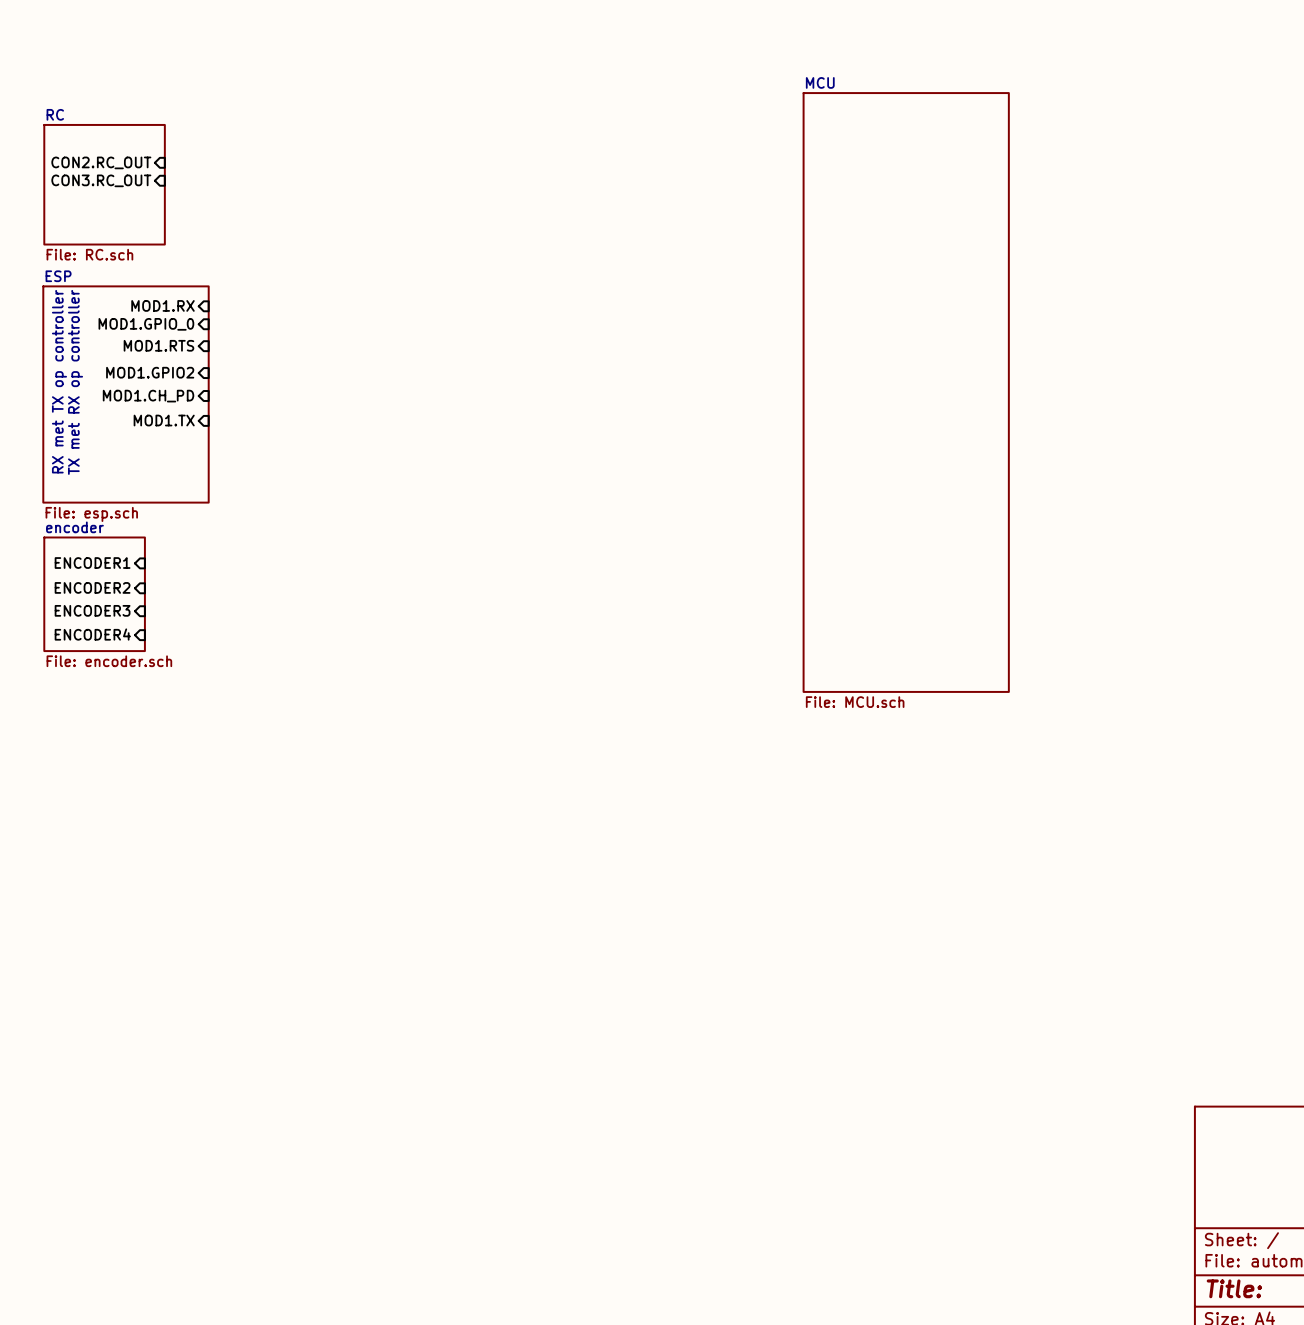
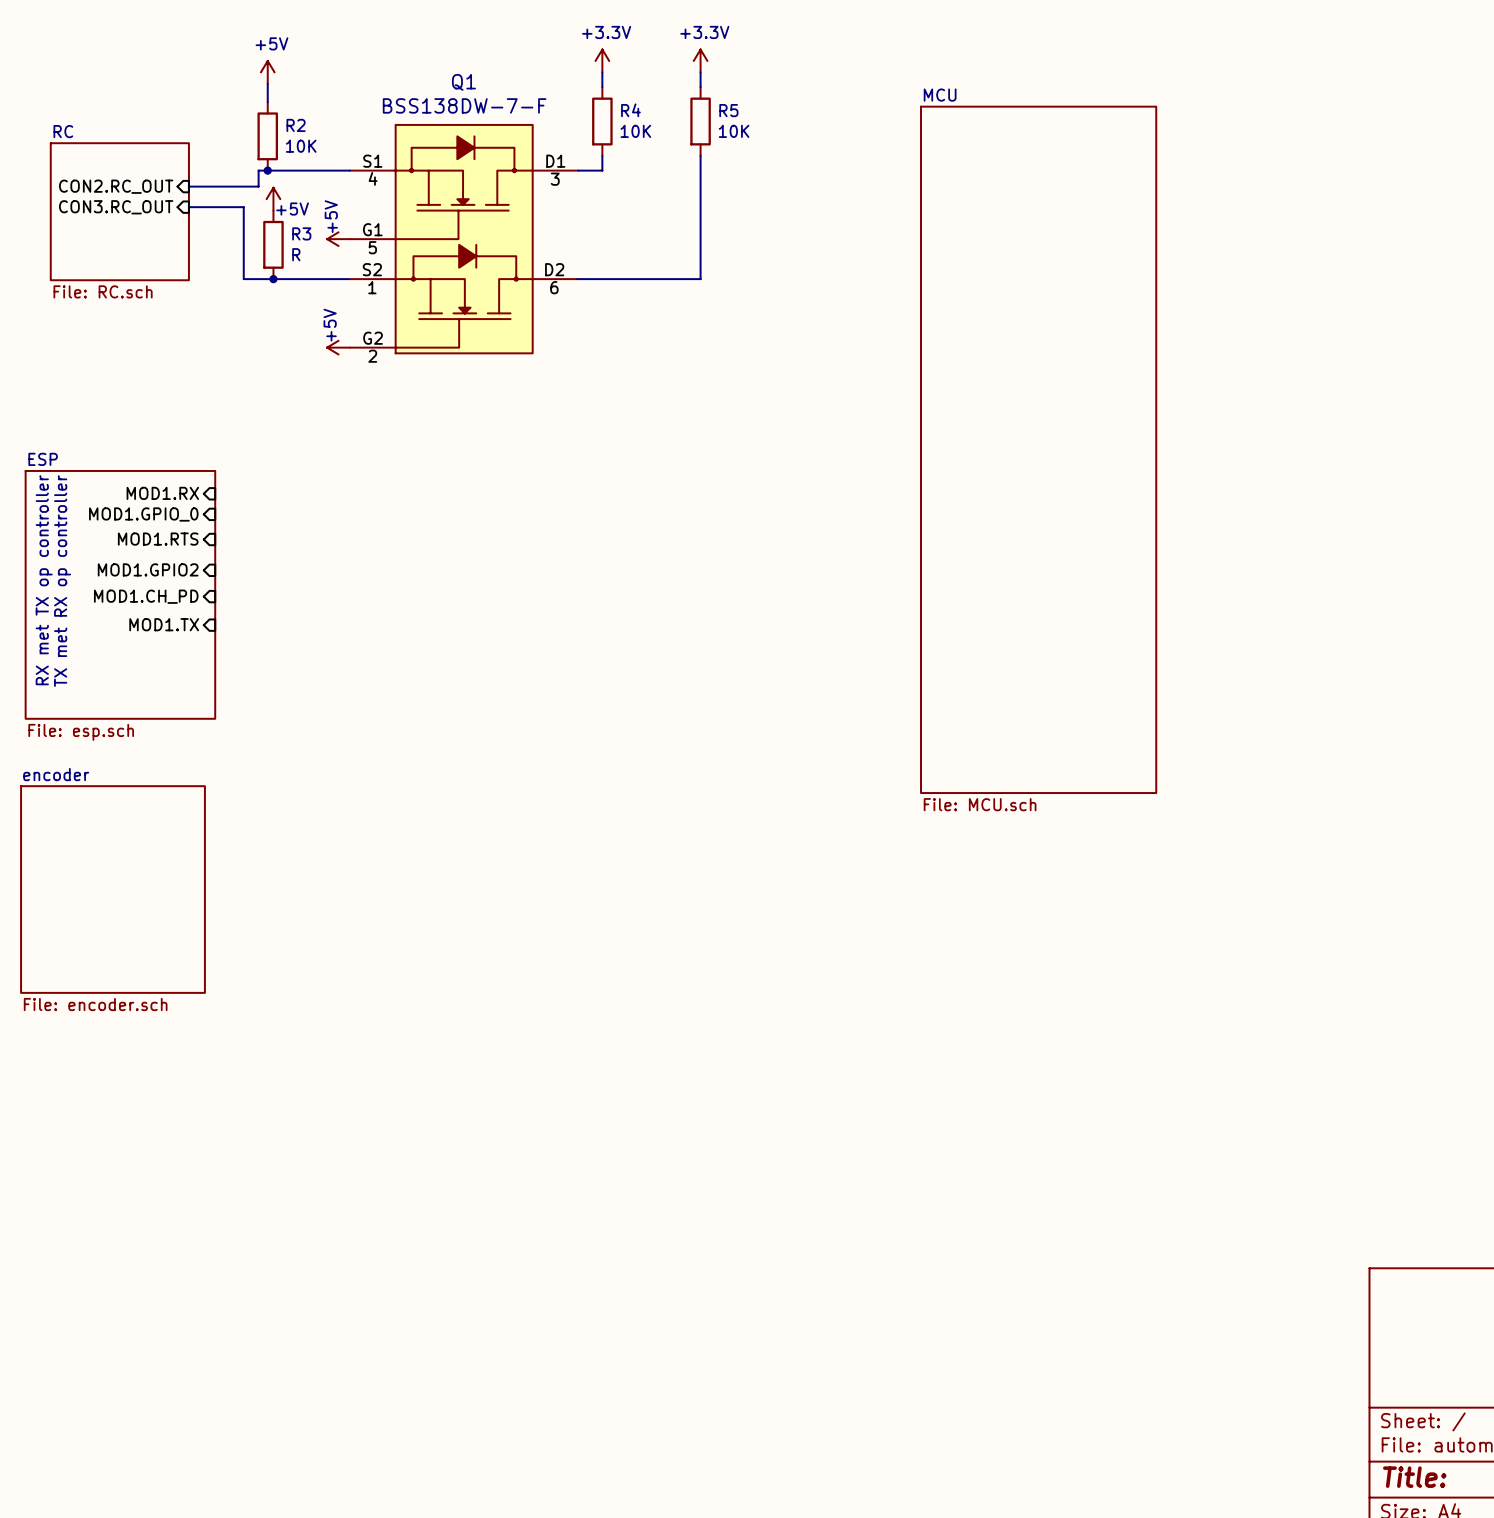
power symbol: none -> +3.3V (602, 60)
power symbol: none -> +3.3V (700, 60)
power symbol: none -> +5V (267, 72)
wire: none -> (602, 72) (602, 87)
wire: none -> (700, 72) (700, 87)
wire: none -> (267, 83) (267, 102)
R4: none -> 10K (602, 121)
R5: none -> 10K (700, 121)
R2: none -> 10K (267, 136)
wire: none -> (602, 155) (602, 170) (578, 170)
wire: none -> (700, 155) (700, 279) (577, 279)
junction: none -> (267, 170)
wire: none -> (349, 170) (258, 170) (258, 186) (188, 186)
power symbol: none -> +5V (273, 199)
wire: none -> (188, 207) (243, 207) (243, 279) (348, 279)
power symbol: none -> +5V (338, 239)
Q1: none -> BSS138DW-7-F (463, 239)
R3: none -> R (273, 244)
junction: none -> (273, 279)
power symbol: none -> +5V (338, 347)
sheet pin position: MOD1.RX (162, 305) -> MOD1.RX (162, 493)
sheet pin position: MOD1.GPIO_0 (146, 324) -> MOD1.GPIO_0 (143, 514)
sheet pin position: MOD1.RTS (158, 345) -> MOD1.RTS (158, 539)
sheet pin position: MOD1.GPIO2 (150, 372) -> MOD1.GPIO2 (148, 569)
text position: RX met TX op controller (59, 381) -> RX met TX op controller (44, 580)
text position: TX met RX op controller (75, 382) -> TX met RX op controller (62, 581)
sheet ESP position: (125, 394) -> (120, 594)
sheet pin position: MOD1.CH_PD (148, 396) -> MOD1.CH_PD (146, 596)
sheet pin position: MOD1.TX (164, 420) -> MOD1.TX (164, 624)
sheet pin: ENCODER1 (92, 563) -> none
sheet pin: ENCODER2 (92, 587) -> none
sheet encoder: File: encoder.sch (94, 594) -> none
sheet pin: ENCODER3 (92, 610) -> none
sheet pin: ENCODER4 (92, 634) -> none
sheet encoder: none -> File: encoder.sch (113, 889)

